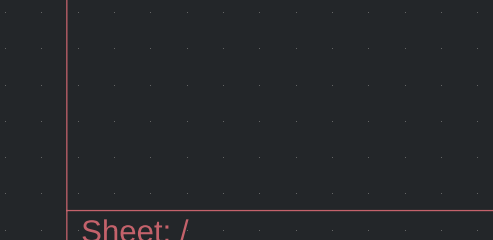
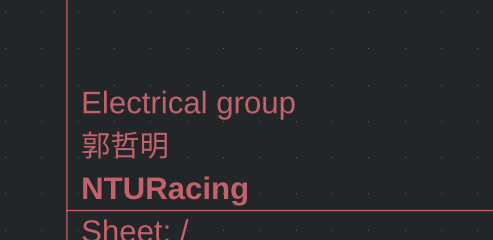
title block: none -> Electrical group (189, 105)
title block: none -> 郭哲明 (124, 145)
title block: none -> NTURacing (165, 191)

